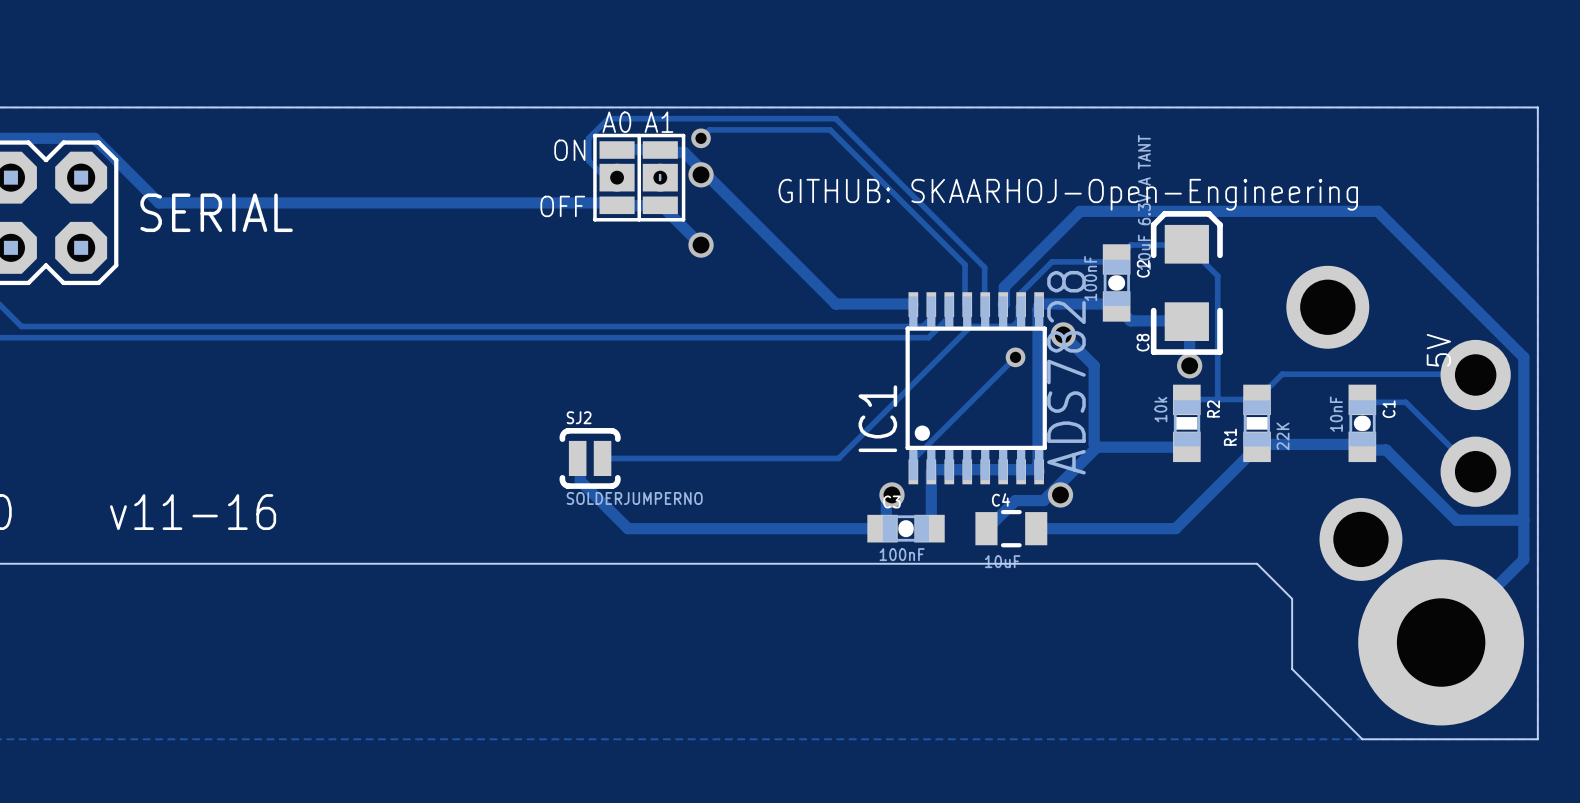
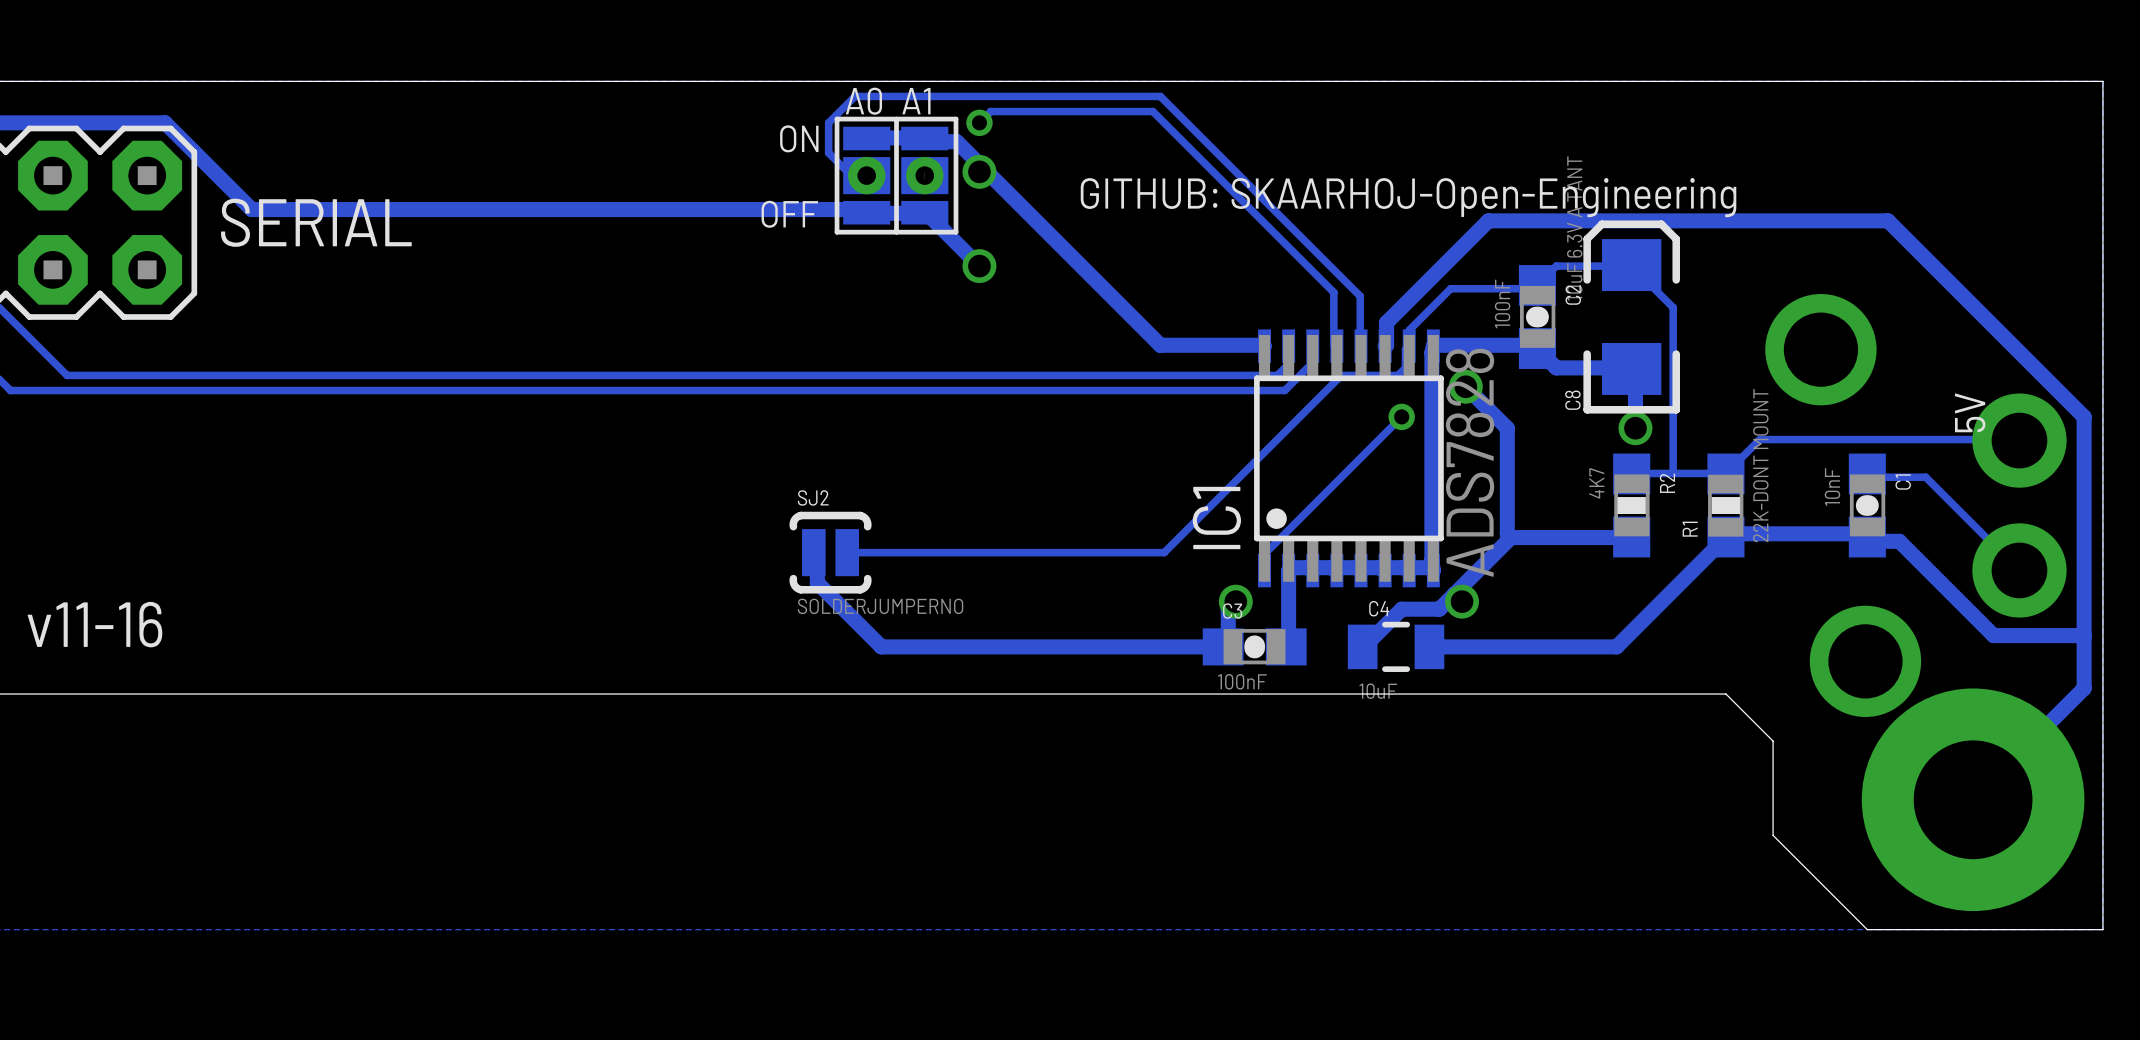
R2 value: 10k (1160, 409) -> 4K7 (1596, 483)
R1 value: 22K (1283, 436) -> 22K-DONT MOUNT (1760, 465)

